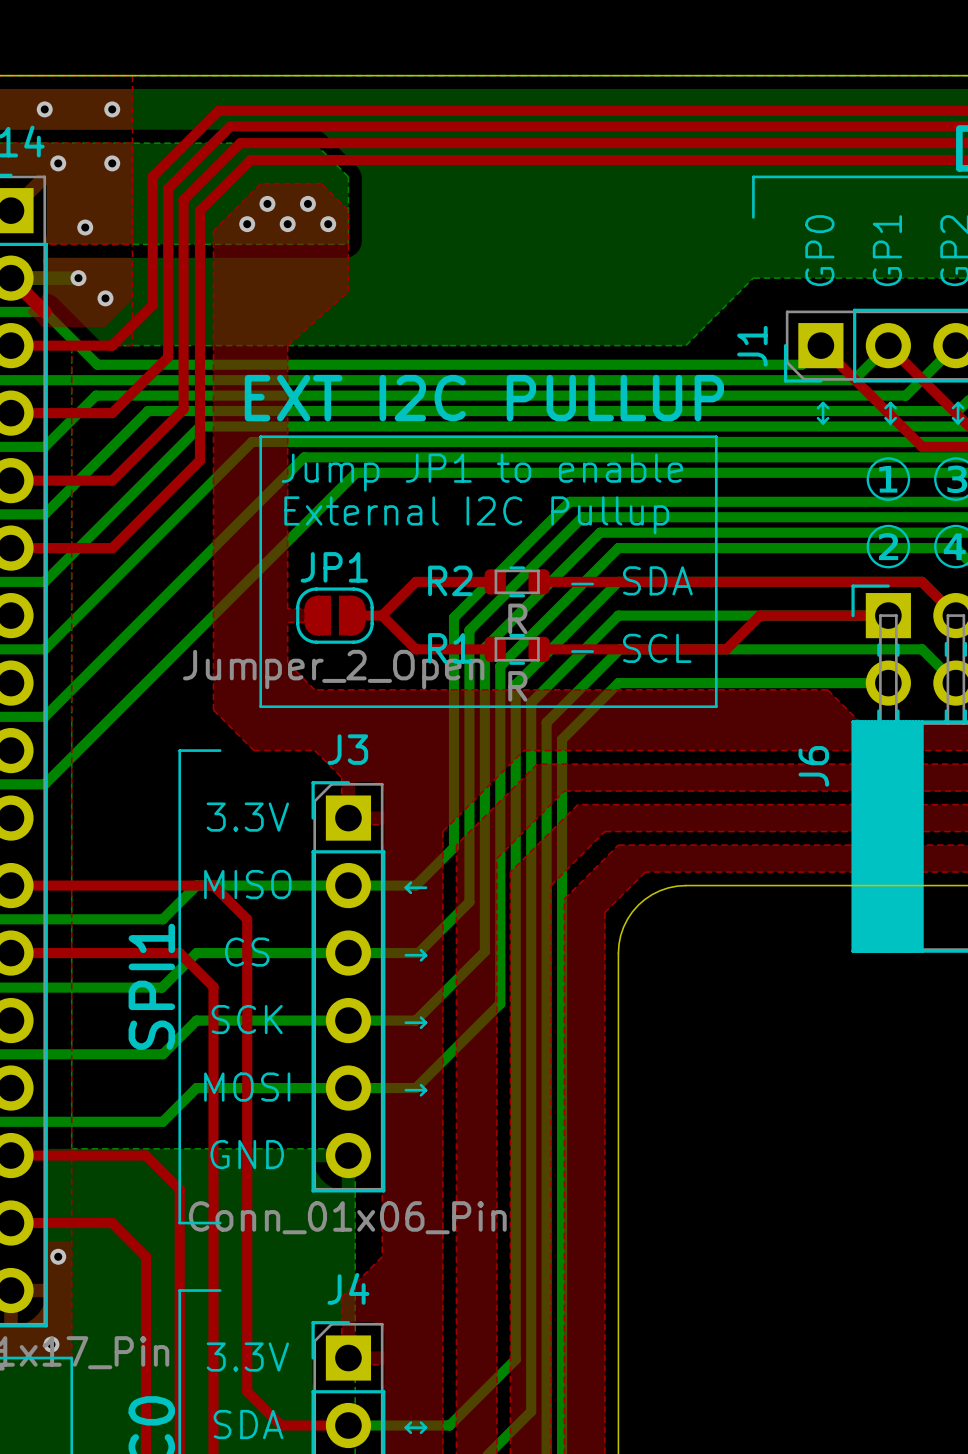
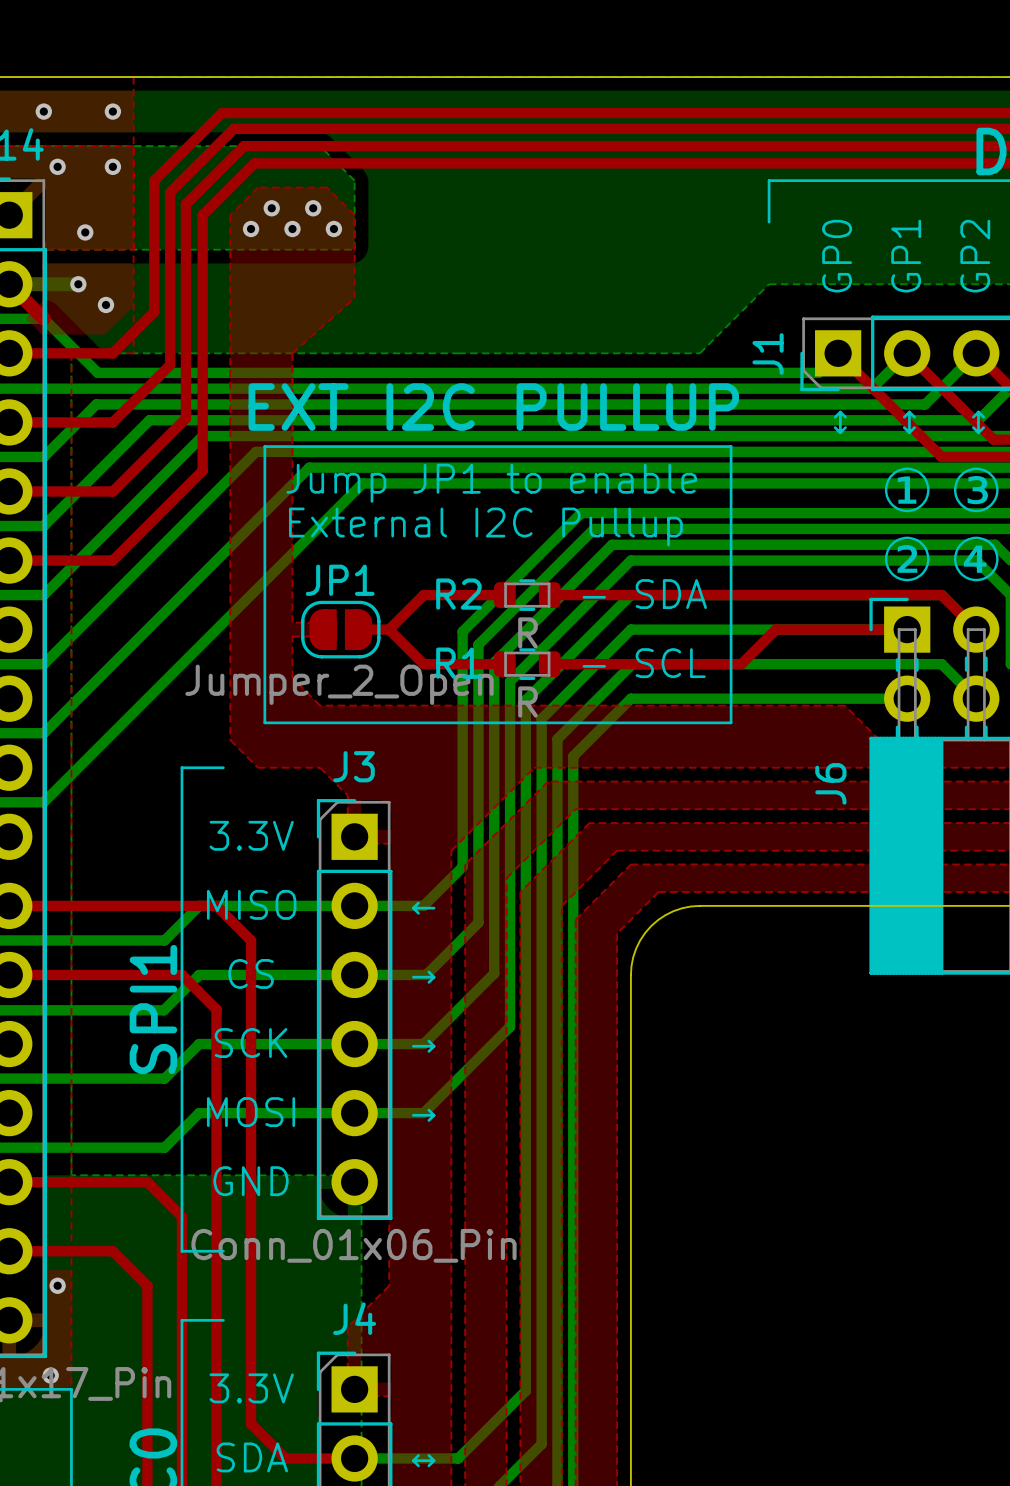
top zone outline: (260, 183) (213, 230) (213, 710) (226, 723) -> (264, 187) (257, 187) (230, 215) (230, 740)

